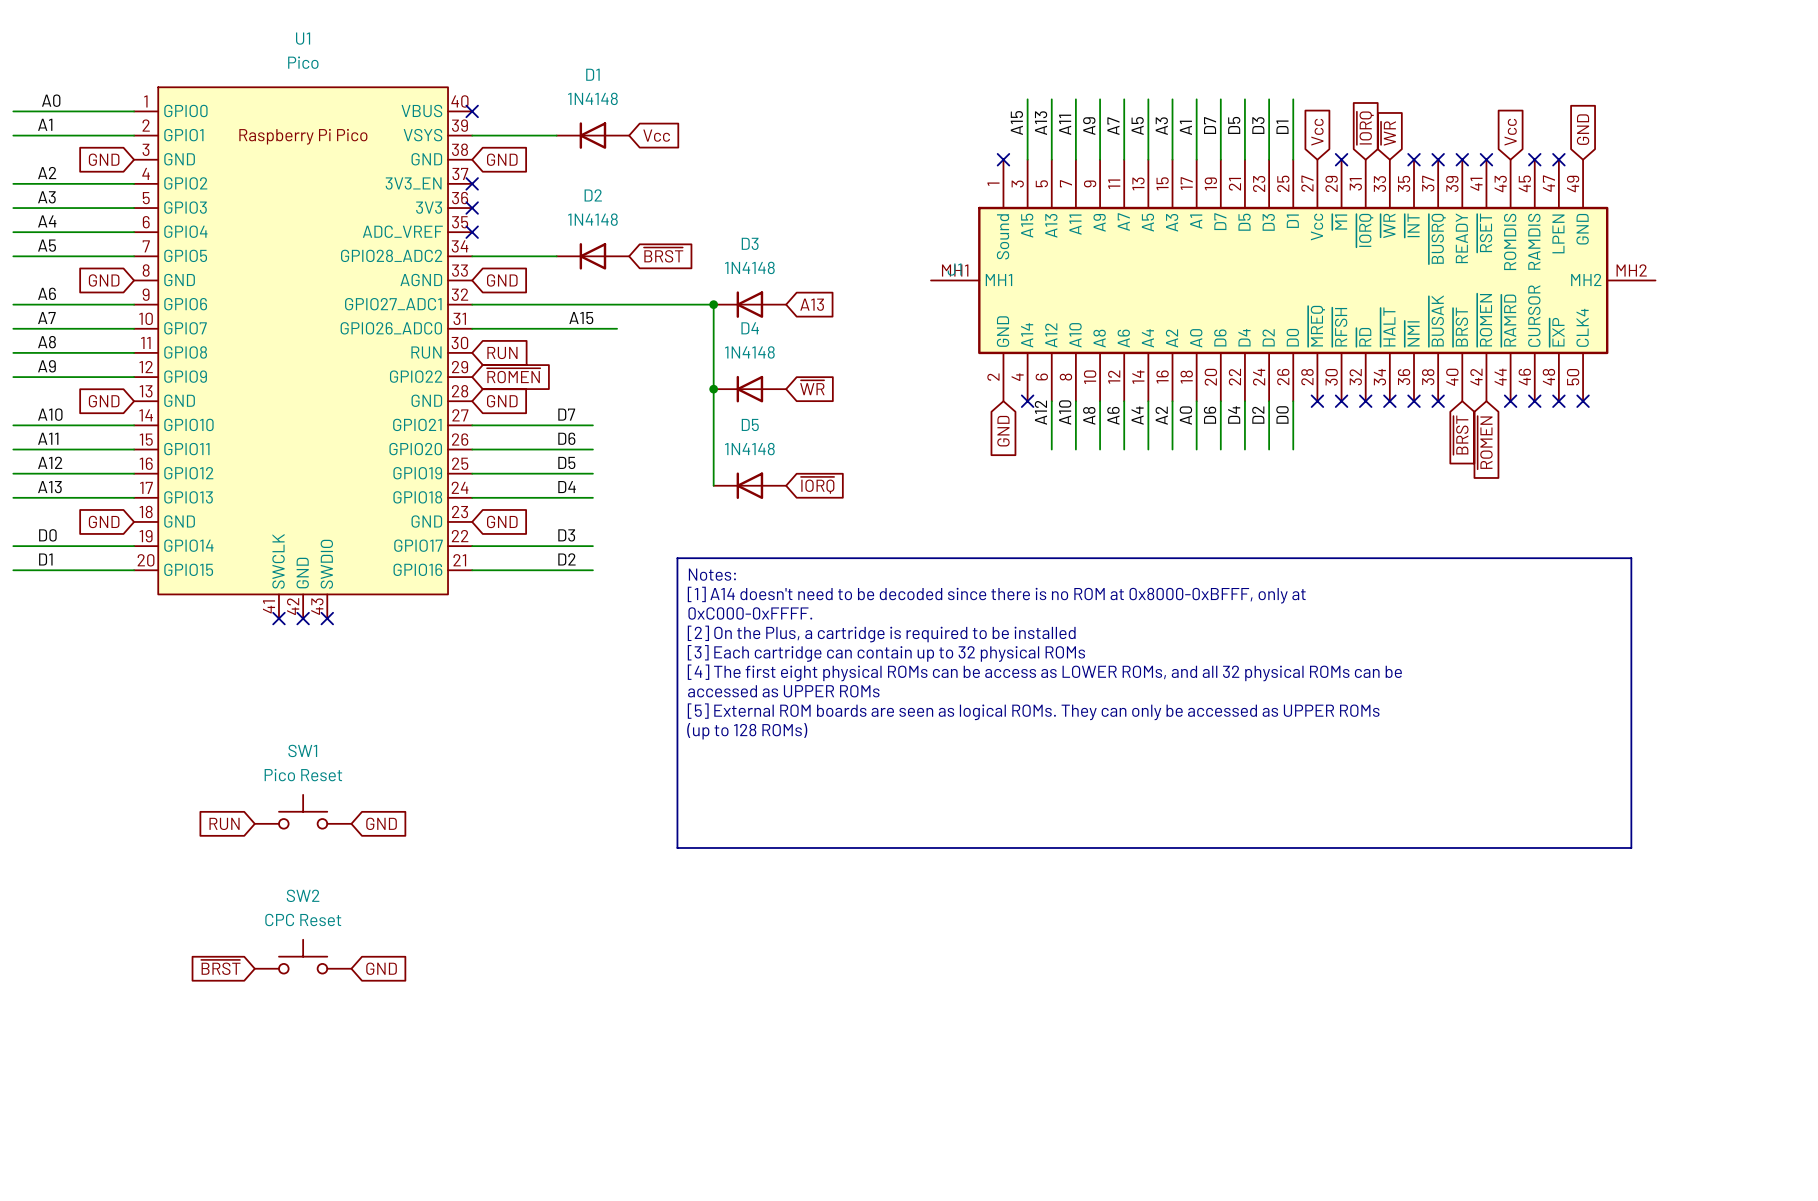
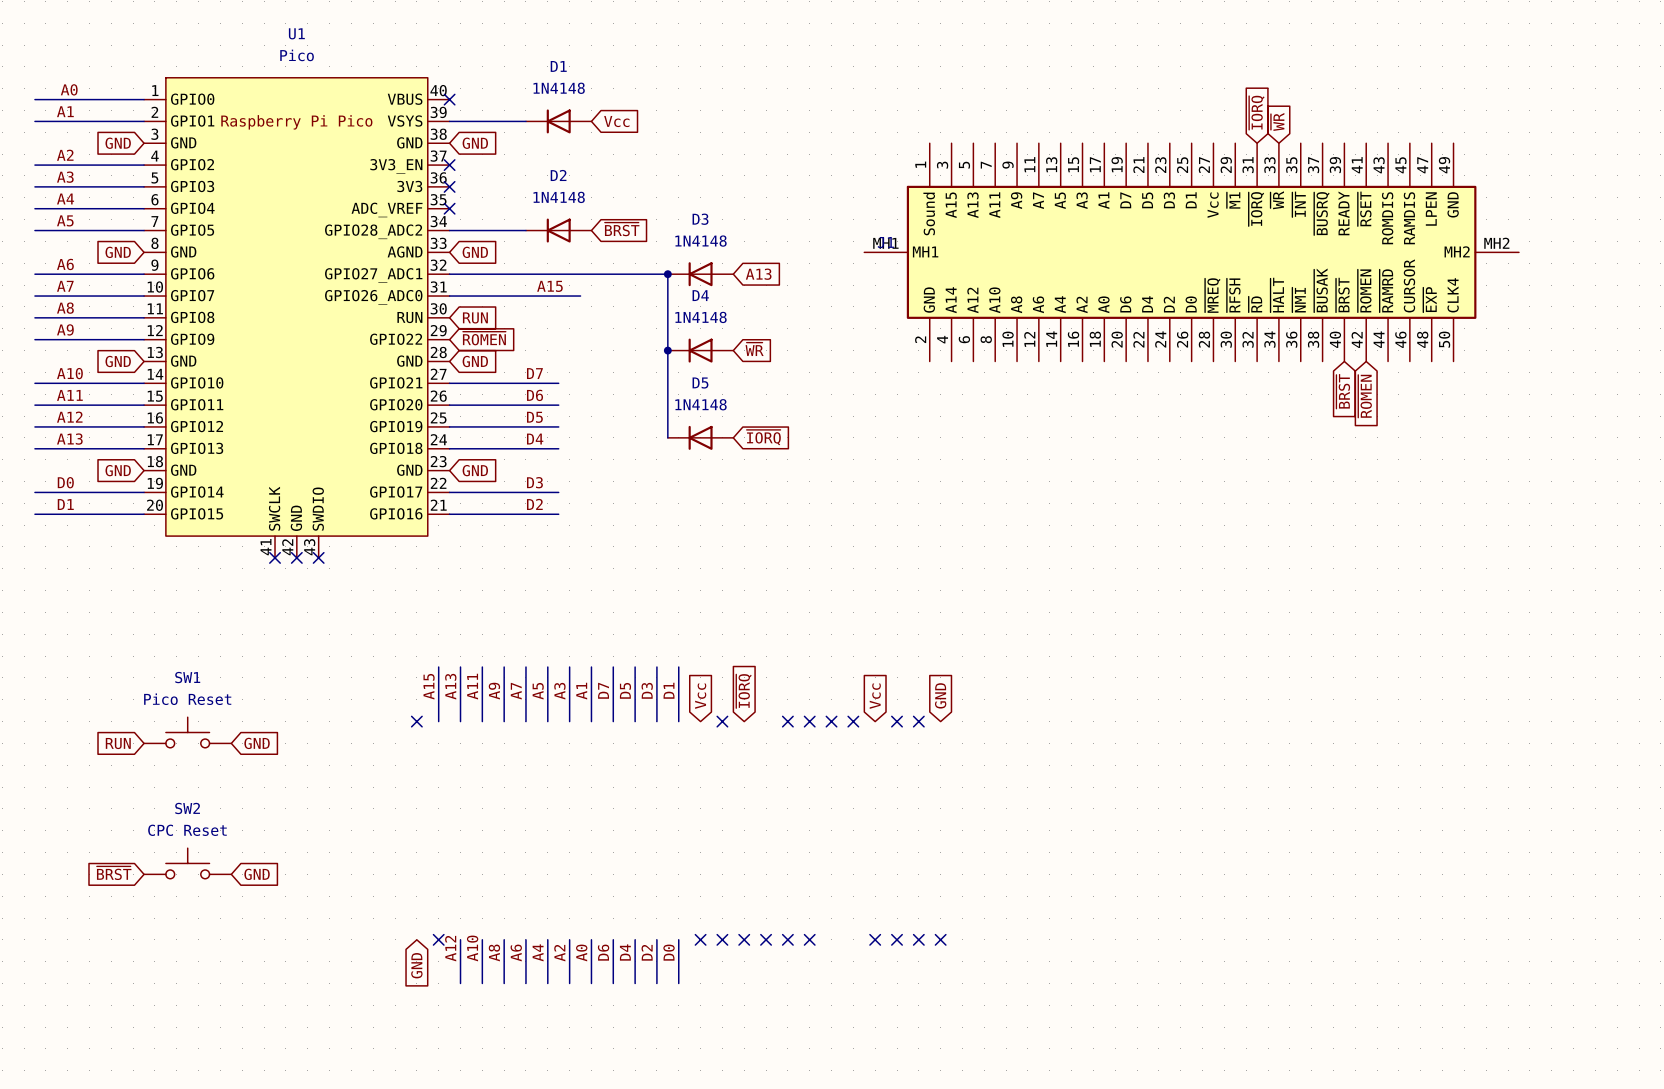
wire: (1027, 99) (1027, 159) -> none
wire: (1051, 99) (1051, 159) -> none
wire: (1075, 99) (1075, 159) -> none
wire: (1100, 99) (1100, 159) -> none
wire: (1124, 99) (1124, 159) -> none
wire: (1148, 99) (1148, 159) -> none
wire: (1172, 99) (1172, 159) -> none
wire: (1196, 99) (1196, 159) -> none
wire: (1220, 99) (1220, 159) -> none
wire: (1244, 99) (1244, 159) -> none
wire: (1269, 99) (1269, 159) -> none
wire: (1293, 99) (1293, 159) -> none
label: A15 (1016, 123) -> none
label: A13 (1041, 123) -> none
label: A11 (1065, 124) -> none
label: D7 (1210, 125) -> none
label: D5 (1234, 125) -> none
label: D3 (1258, 125) -> none
label: A9 (1089, 126) -> none
label: A7 (1113, 126) -> none
label: A5 (1137, 126) -> none
label: A3 (1161, 126) -> none
label: A1 (1185, 127) -> none
label: D1 (1282, 127) -> none
global label: GND (1583, 129) -> none
global label: Vcc (1317, 132) -> none
global label: Vcc (1510, 132) -> none
no-connect mark: (1003, 159) -> none
no-connect mark: (1341, 159) -> none
no-connect mark: (1414, 159) -> none
no-connect mark: (1438, 159) -> none
no-connect mark: (1462, 159) -> none
no-connect mark: (1486, 159) -> none
no-connect mark: (1534, 159) -> none
no-connect mark: (1558, 159) -> none
no-connect mark: (1027, 401) -> none
wire: (1051, 401) (1051, 449) -> none
wire: (1075, 401) (1075, 449) -> none
wire: (1100, 401) (1100, 449) -> none
wire: (1124, 401) (1124, 449) -> none
wire: (1148, 401) (1148, 449) -> none
wire: (1172, 401) (1172, 449) -> none
wire: (1196, 401) (1196, 449) -> none
wire: (1220, 401) (1220, 449) -> none
wire: (1244, 401) (1244, 449) -> none
wire: (1269, 401) (1269, 449) -> none
wire: (1293, 401) (1293, 449) -> none
no-connect mark: (1317, 401) -> none
no-connect mark: (1341, 401) -> none
no-connect mark: (1365, 401) -> none
no-connect mark: (1389, 401) -> none
no-connect mark: (1414, 401) -> none
no-connect mark: (1438, 401) -> none
no-connect mark: (1510, 401) -> none
no-connect mark: (1534, 401) -> none
no-connect mark: (1558, 401) -> none
no-connect mark: (1583, 401) -> none
label: A12 (1040, 412) -> none
label: A10 (1065, 412) -> none
label: D0 (1282, 414) -> none
label: A8 (1089, 415) -> none
label: A6 (1113, 415) -> none
label: A4 (1137, 415) -> none
label: A2 (1161, 415) -> none
label: A0 (1185, 415) -> none
label: D6 (1210, 415) -> none
label: D4 (1234, 415) -> none
label: D2 (1258, 415) -> none
global label: GND (1003, 431) -> none
line: (677, 558) (1631, 558) (1631, 847) (677, 847) (677, 558) -> none
text: Notes: (712, 574) -> none
text: [1] A14 doesn't need to be decoded since there is no ROM at 0x8000-0xBFFF, only at (996, 595) -> none
text: 0xC000-0xFFFF. (750, 613) -> none
text: [2] On the Plus, a cartridge is required to be installed (881, 633) -> none
text: [3] Each cartridge can contain up to 32 physical ROMs (886, 653) -> none
text: [4] The first eight physical ROMs can be access as LOWER ROMs, and all 32 physical ROMs can be (1044, 672) -> none
text: accessed as UPPER ROMs (783, 691) -> none
text: [5] External ROM boards are seen as logical ROMs. They can only be accessed as UPPER ROMs (1033, 711) -> none
text: (up to 128 ROMs) (747, 731) -> none
wire: none -> (438, 667) (438, 721)
wire: none -> (460, 667) (460, 721)
wire: none -> (482, 667) (482, 721)
wire: none -> (504, 667) (504, 721)
wire: none -> (525, 667) (525, 721)
wire: none -> (547, 667) (547, 721)
wire: none -> (569, 667) (569, 721)
wire: none -> (591, 667) (591, 721)
wire: none -> (613, 667) (613, 721)
wire: none -> (656, 667) (656, 721)
wire: none -> (678, 667) (678, 721)
label: none -> A15 (429, 686)
label: none -> A13 (450, 686)
label: none -> A11 (472, 686)
label: none -> D7 (603, 690)
label: none -> D5 (625, 690)
label: none -> D3 (647, 690)
label: none -> A9 (494, 691)
label: none -> A7 (516, 691)
label: none -> A5 (538, 691)
label: none -> A3 (559, 691)
label: none -> A1 (581, 691)
label: none -> D1 (669, 690)
global label: none -> ~{IORQ} (743, 691)
global label: none -> GND (940, 695)
global label: none -> Vcc (700, 696)
global label: none -> Vcc (875, 696)
no-connect mark: none -> (416, 721)
no-connect mark: none -> (722, 721)
no-connect mark: none -> (787, 721)
no-connect mark: none -> (809, 721)
no-connect mark: none -> (831, 721)
no-connect mark: none -> (853, 721)
no-connect mark: none -> (897, 721)
no-connect mark: none -> (918, 721)
SW1 position: (303, 811) -> (187, 732)
global label position: RUN (224, 823) -> RUN (118, 743)
global label: none -> GND (257, 743)
global label: GND (381, 823) -> none
SW2 position: (303, 956) -> (187, 863)
global label position: ~{BRST} (220, 967) -> ~{BRST} (114, 873)
global label: none -> GND (257, 874)
global label: GND (381, 968) -> none
no-connect mark: none -> (438, 939)
wire: none -> (460, 939) (460, 983)
wire: none -> (482, 939) (482, 983)
wire: none -> (504, 939) (504, 983)
wire: none -> (525, 939) (525, 983)
wire: none -> (547, 939) (547, 983)
wire: none -> (569, 939) (569, 983)
wire: none -> (591, 939) (591, 983)
wire: none -> (613, 939) (613, 983)
wire: none -> (635, 939) (635, 983)
wire: none -> (656, 939) (656, 983)
wire: none -> (678, 939) (678, 983)
no-connect mark: none -> (700, 939)
no-connect mark: none -> (722, 939)
no-connect mark: none -> (744, 939)
no-connect mark: none -> (766, 939)
no-connect mark: none -> (787, 939)
no-connect mark: none -> (809, 939)
no-connect mark: none -> (875, 939)
no-connect mark: none -> (897, 939)
no-connect mark: none -> (918, 939)
no-connect mark: none -> (940, 939)
label: none -> A12 (450, 948)
label: none -> A10 (472, 948)
label: none -> D4 (625, 952)
label: none -> D0 (669, 952)
label: none -> A8 (494, 952)
label: none -> A6 (516, 952)
label: none -> A4 (538, 952)
label: none -> A2 (559, 953)
label: none -> A0 (581, 952)
label: none -> D6 (603, 952)
label: none -> D2 (647, 952)
global label: none -> GND (416, 965)

